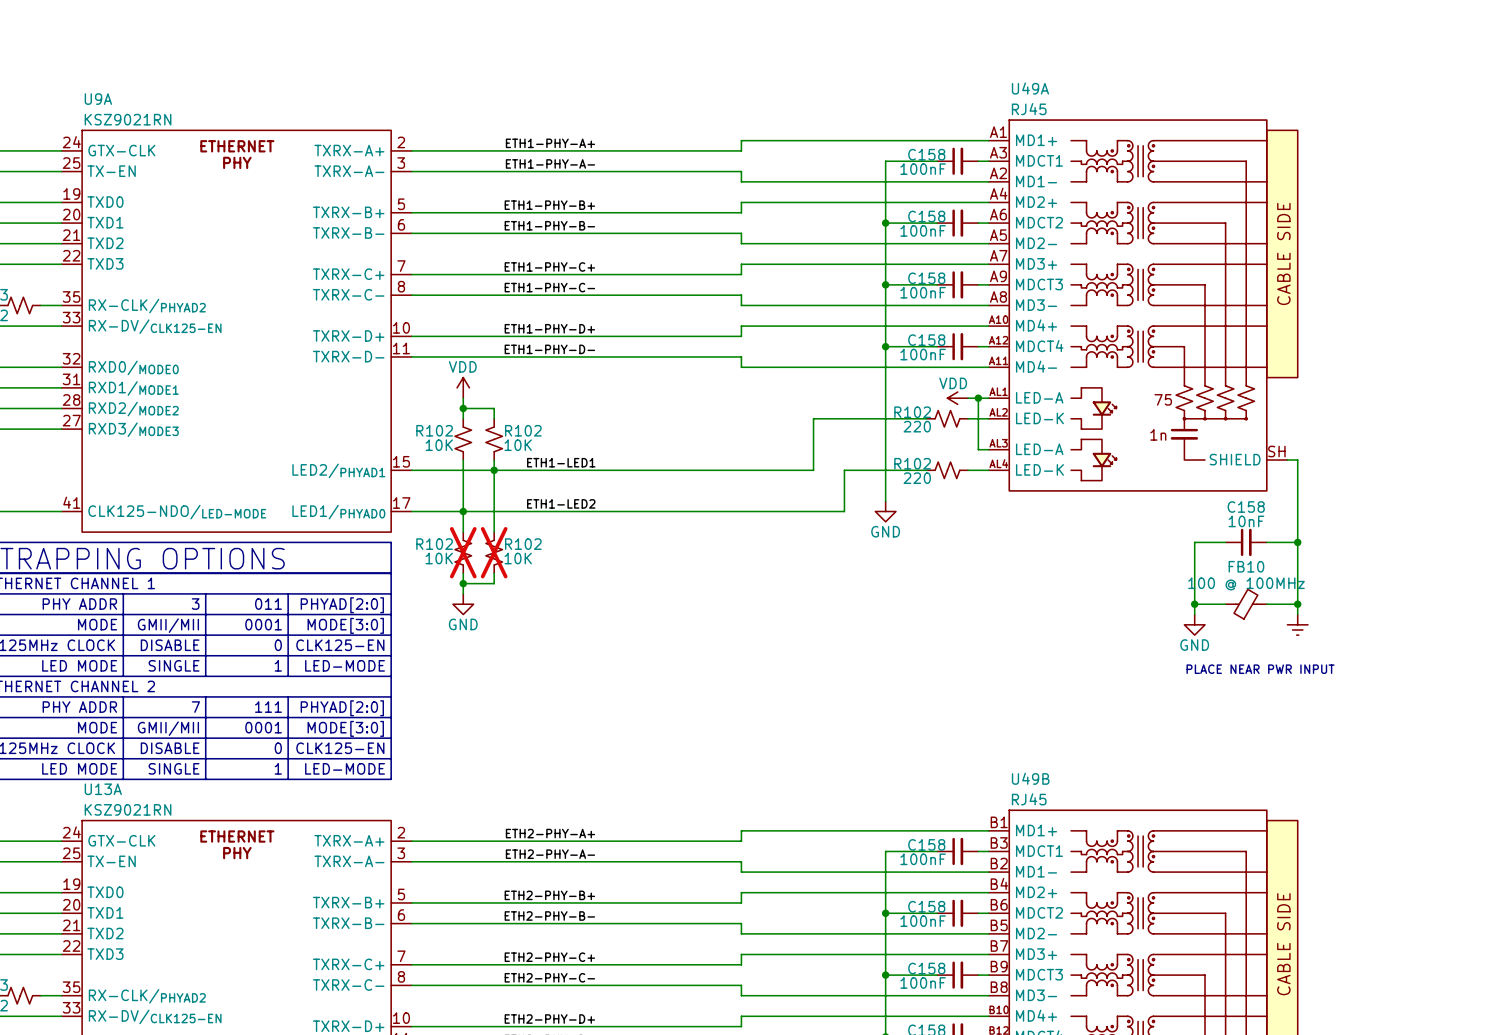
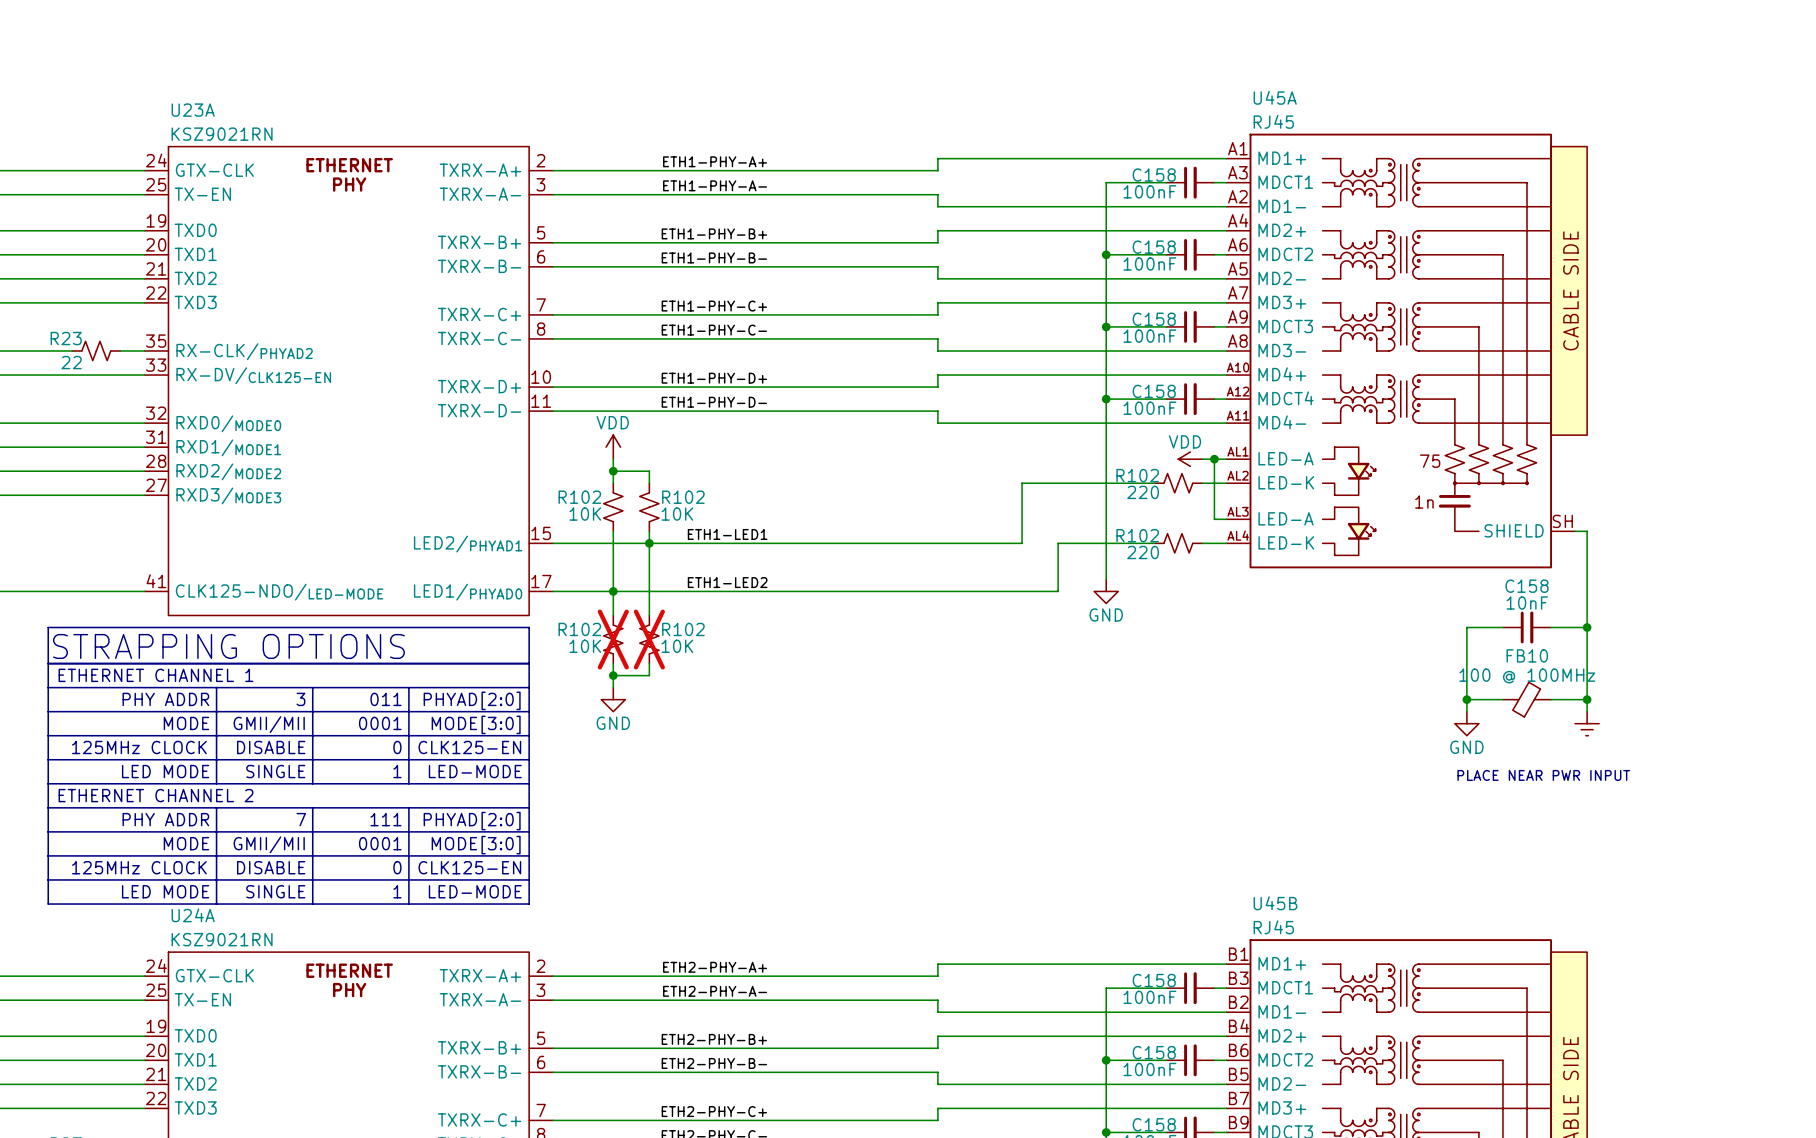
U49A name: U49A (1030, 88) -> U45A (1275, 97)
U9A name: U9A (98, 99) -> U23A (193, 110)
U49B name: U49B (1030, 778) -> U45B (1275, 903)
U13A name: U13A (103, 789) -> U24A (193, 915)

